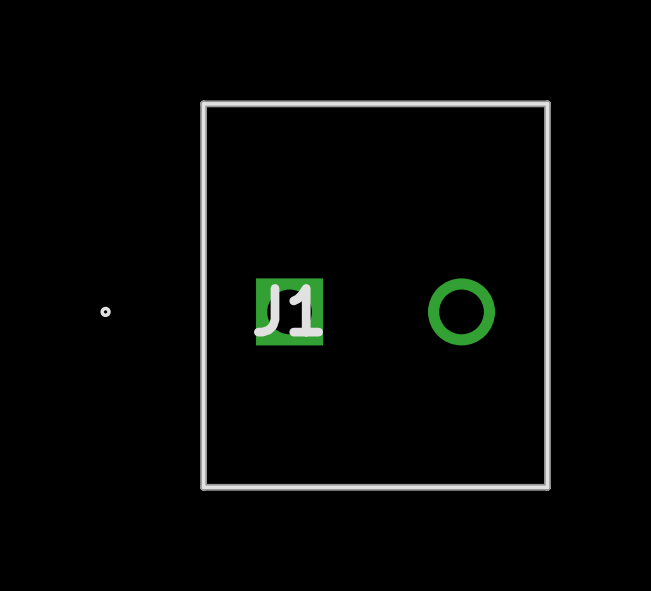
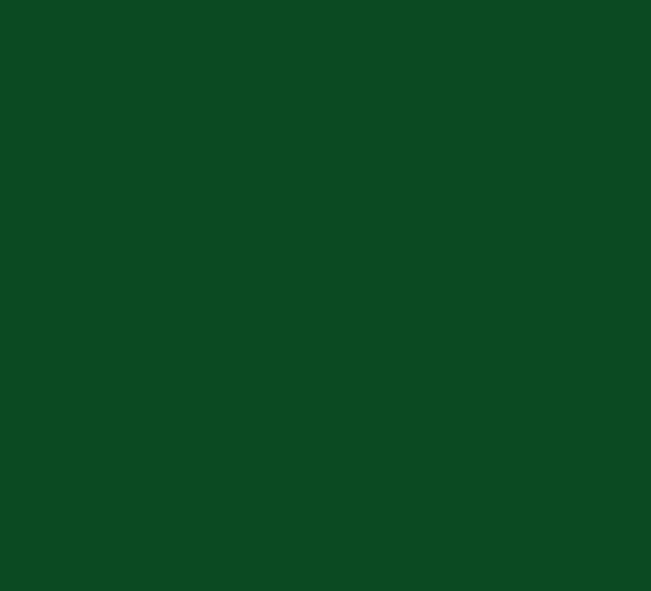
J1: (325, 295) -> none

